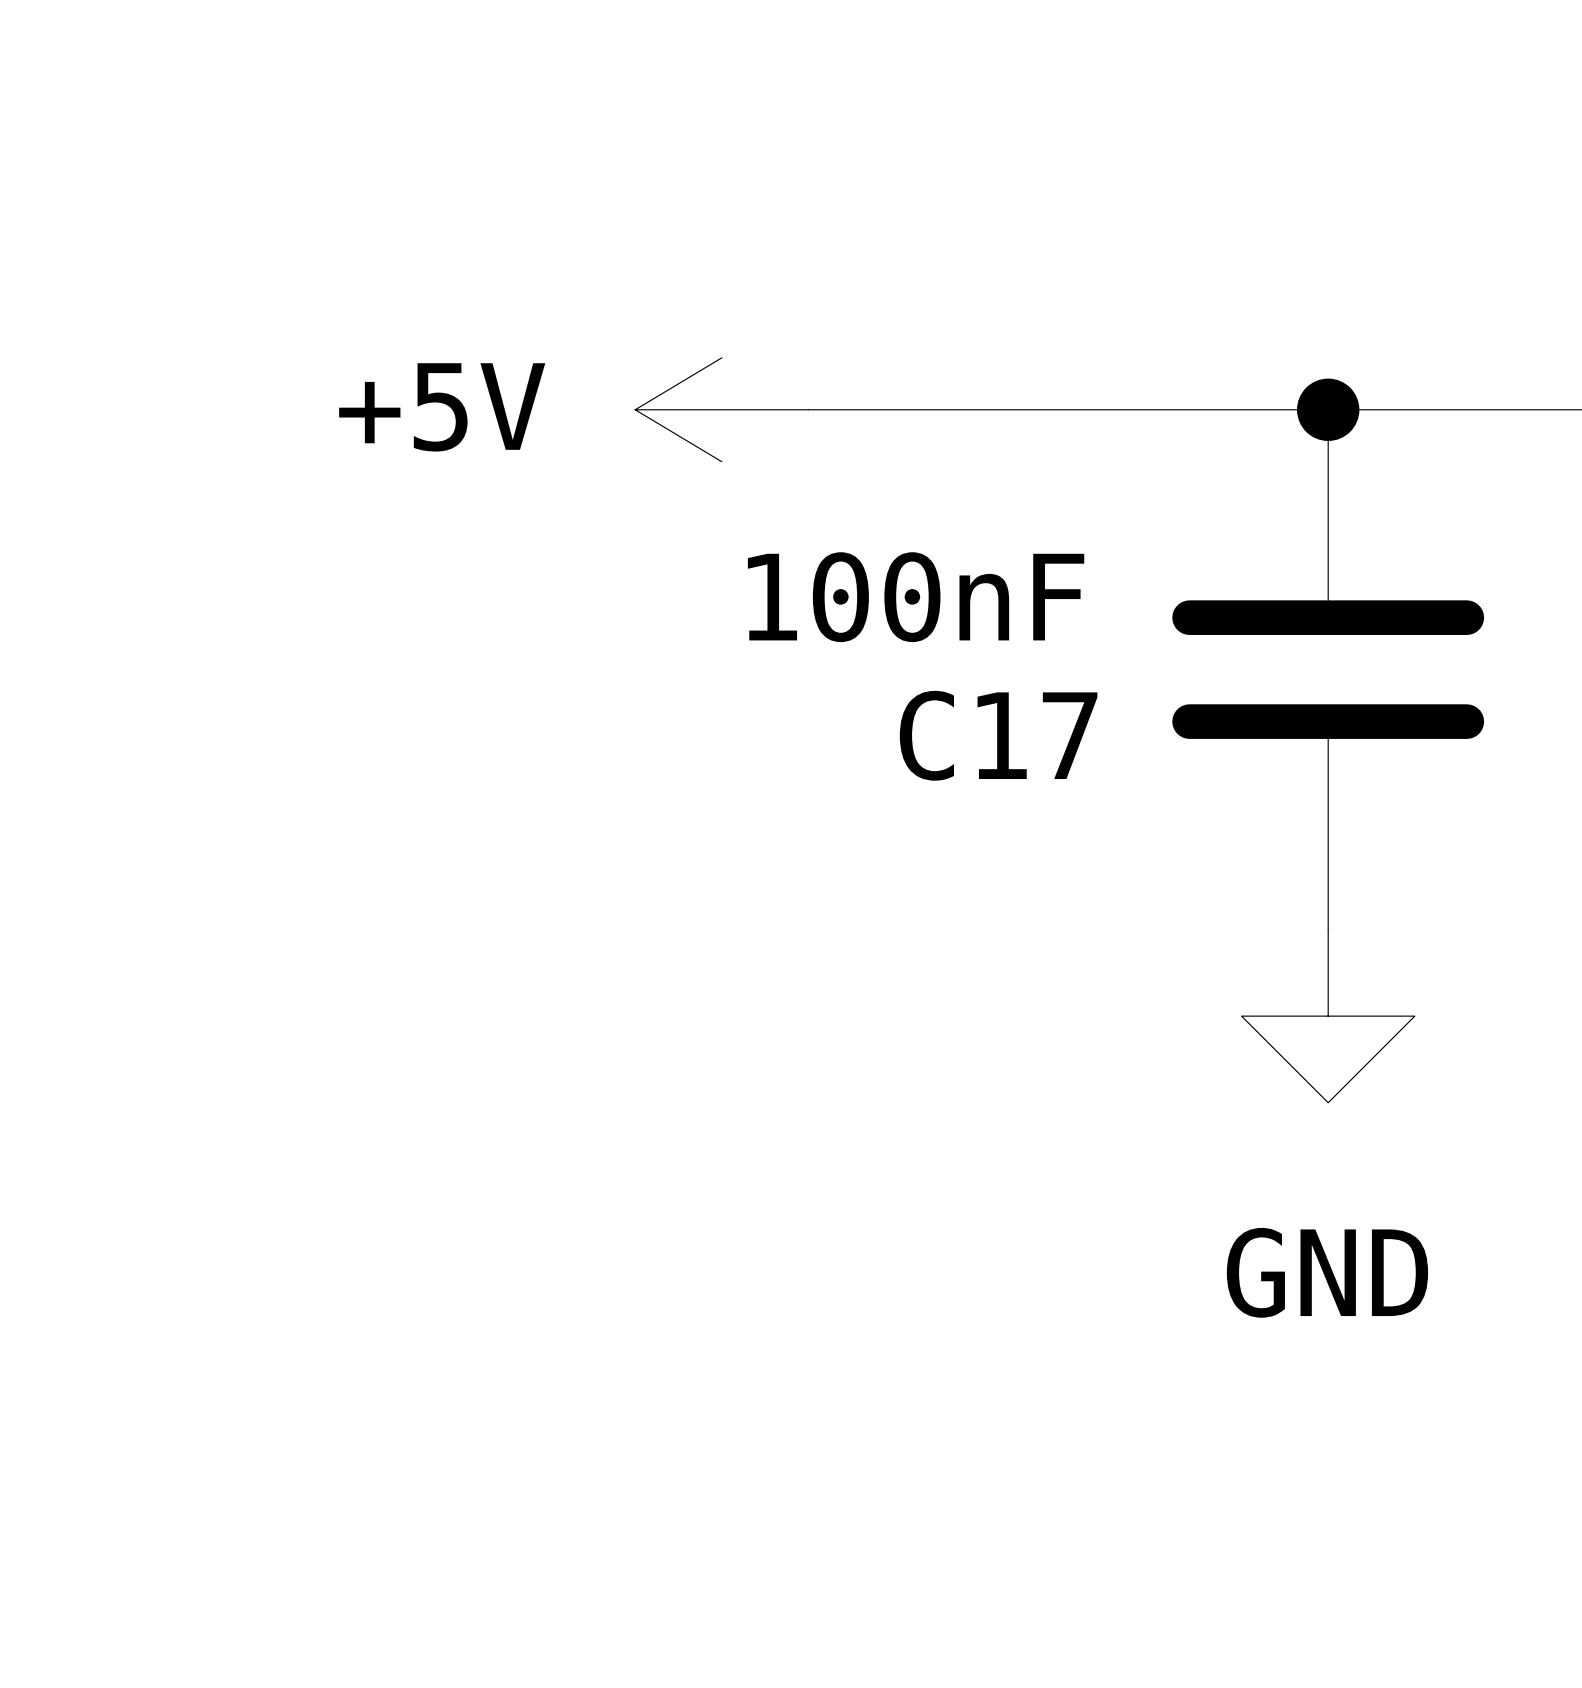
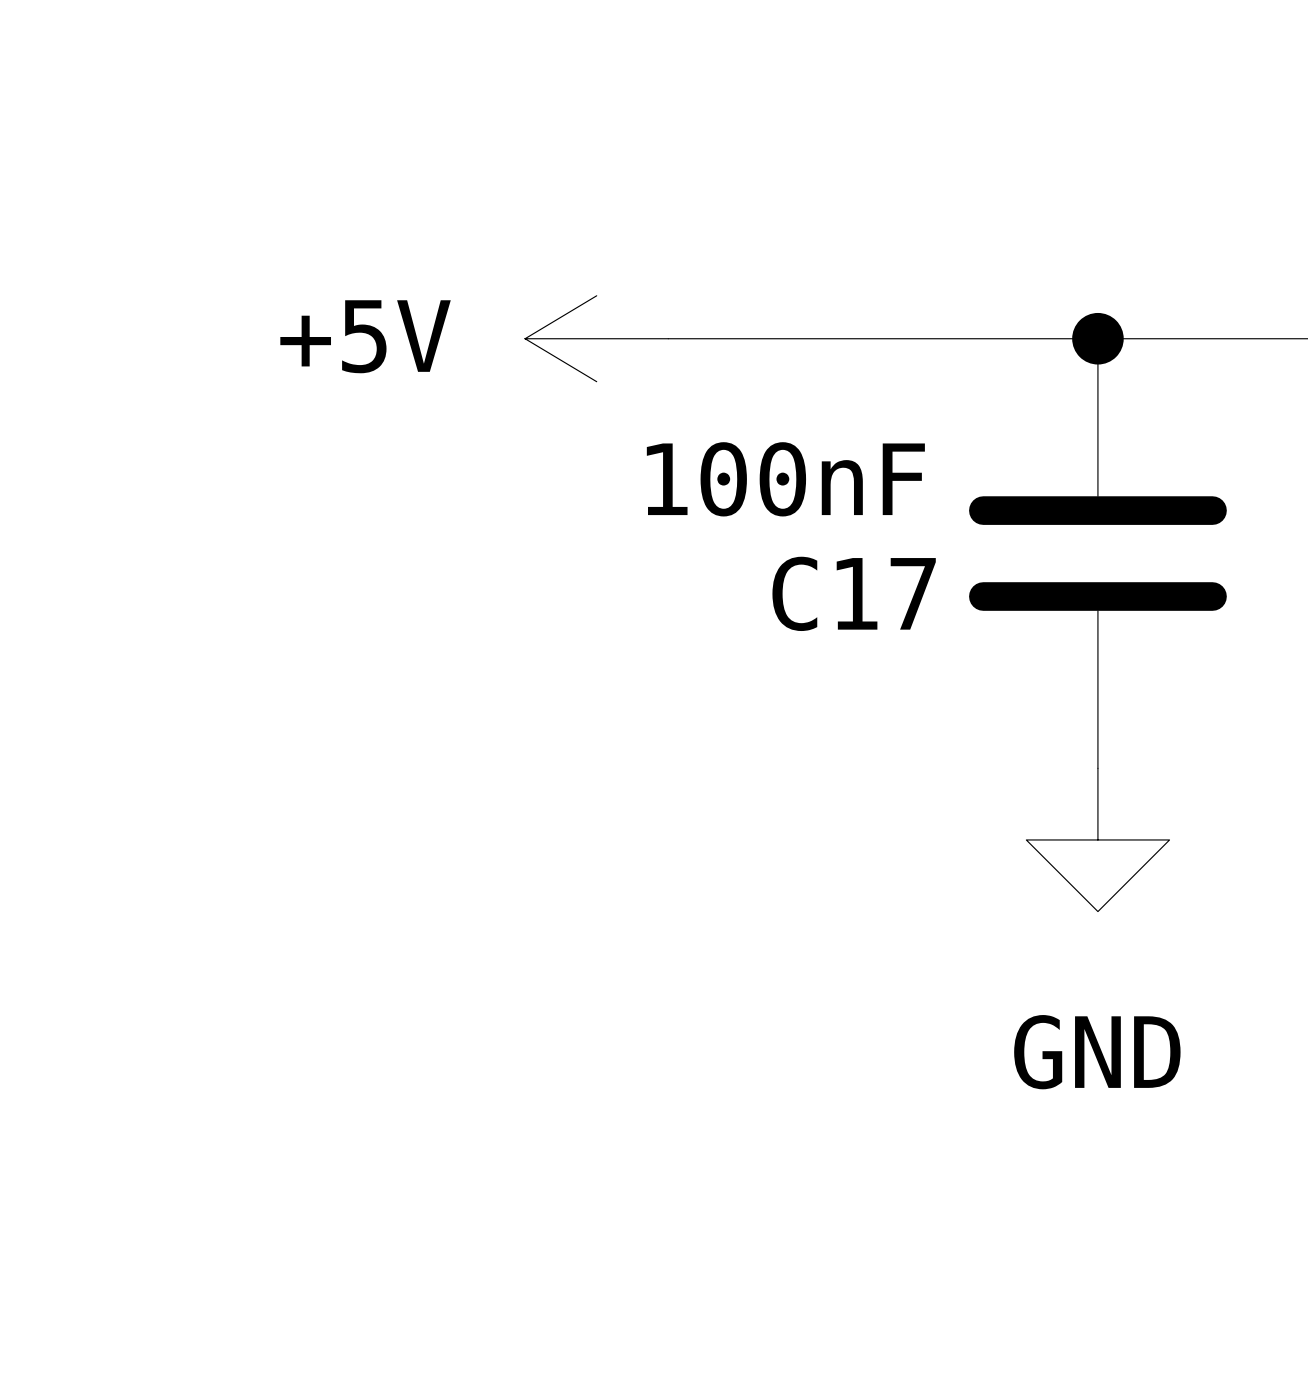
C17 value position: 100nF (916, 597) -> 100nF (785, 479)
C17 name position: C17 (998, 735) -> C17 (854, 593)

